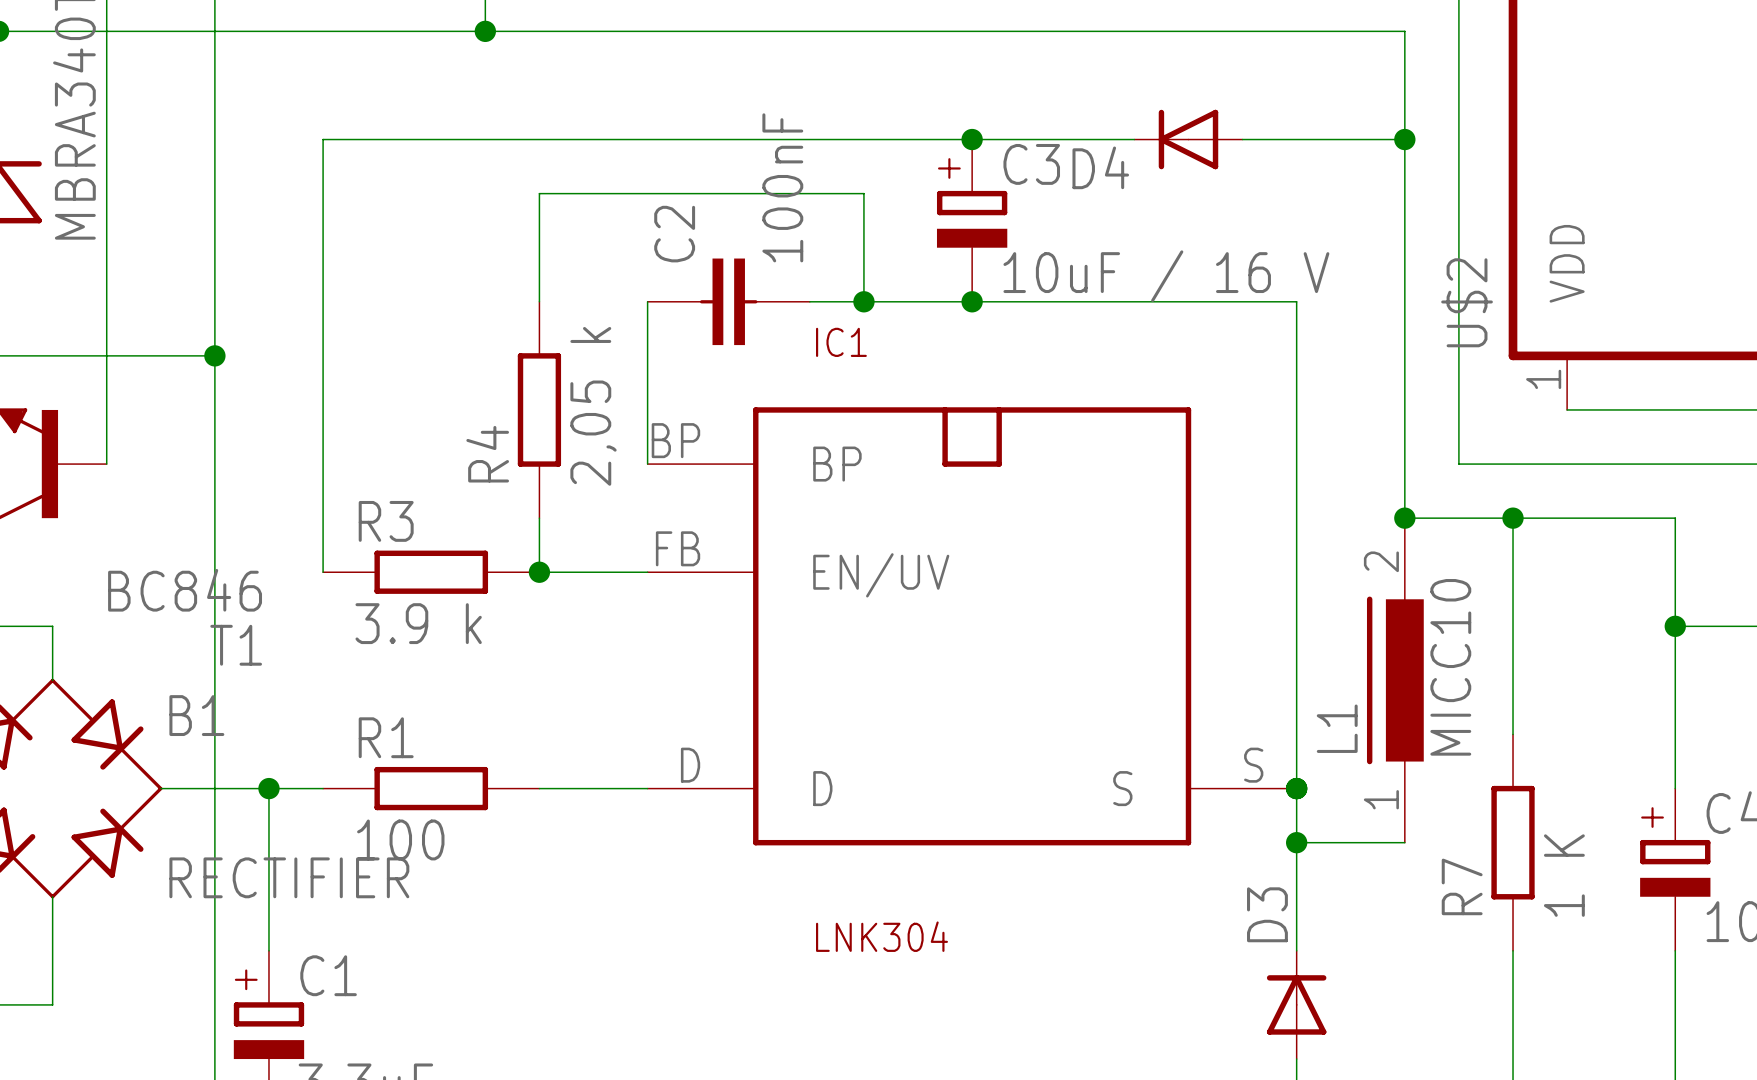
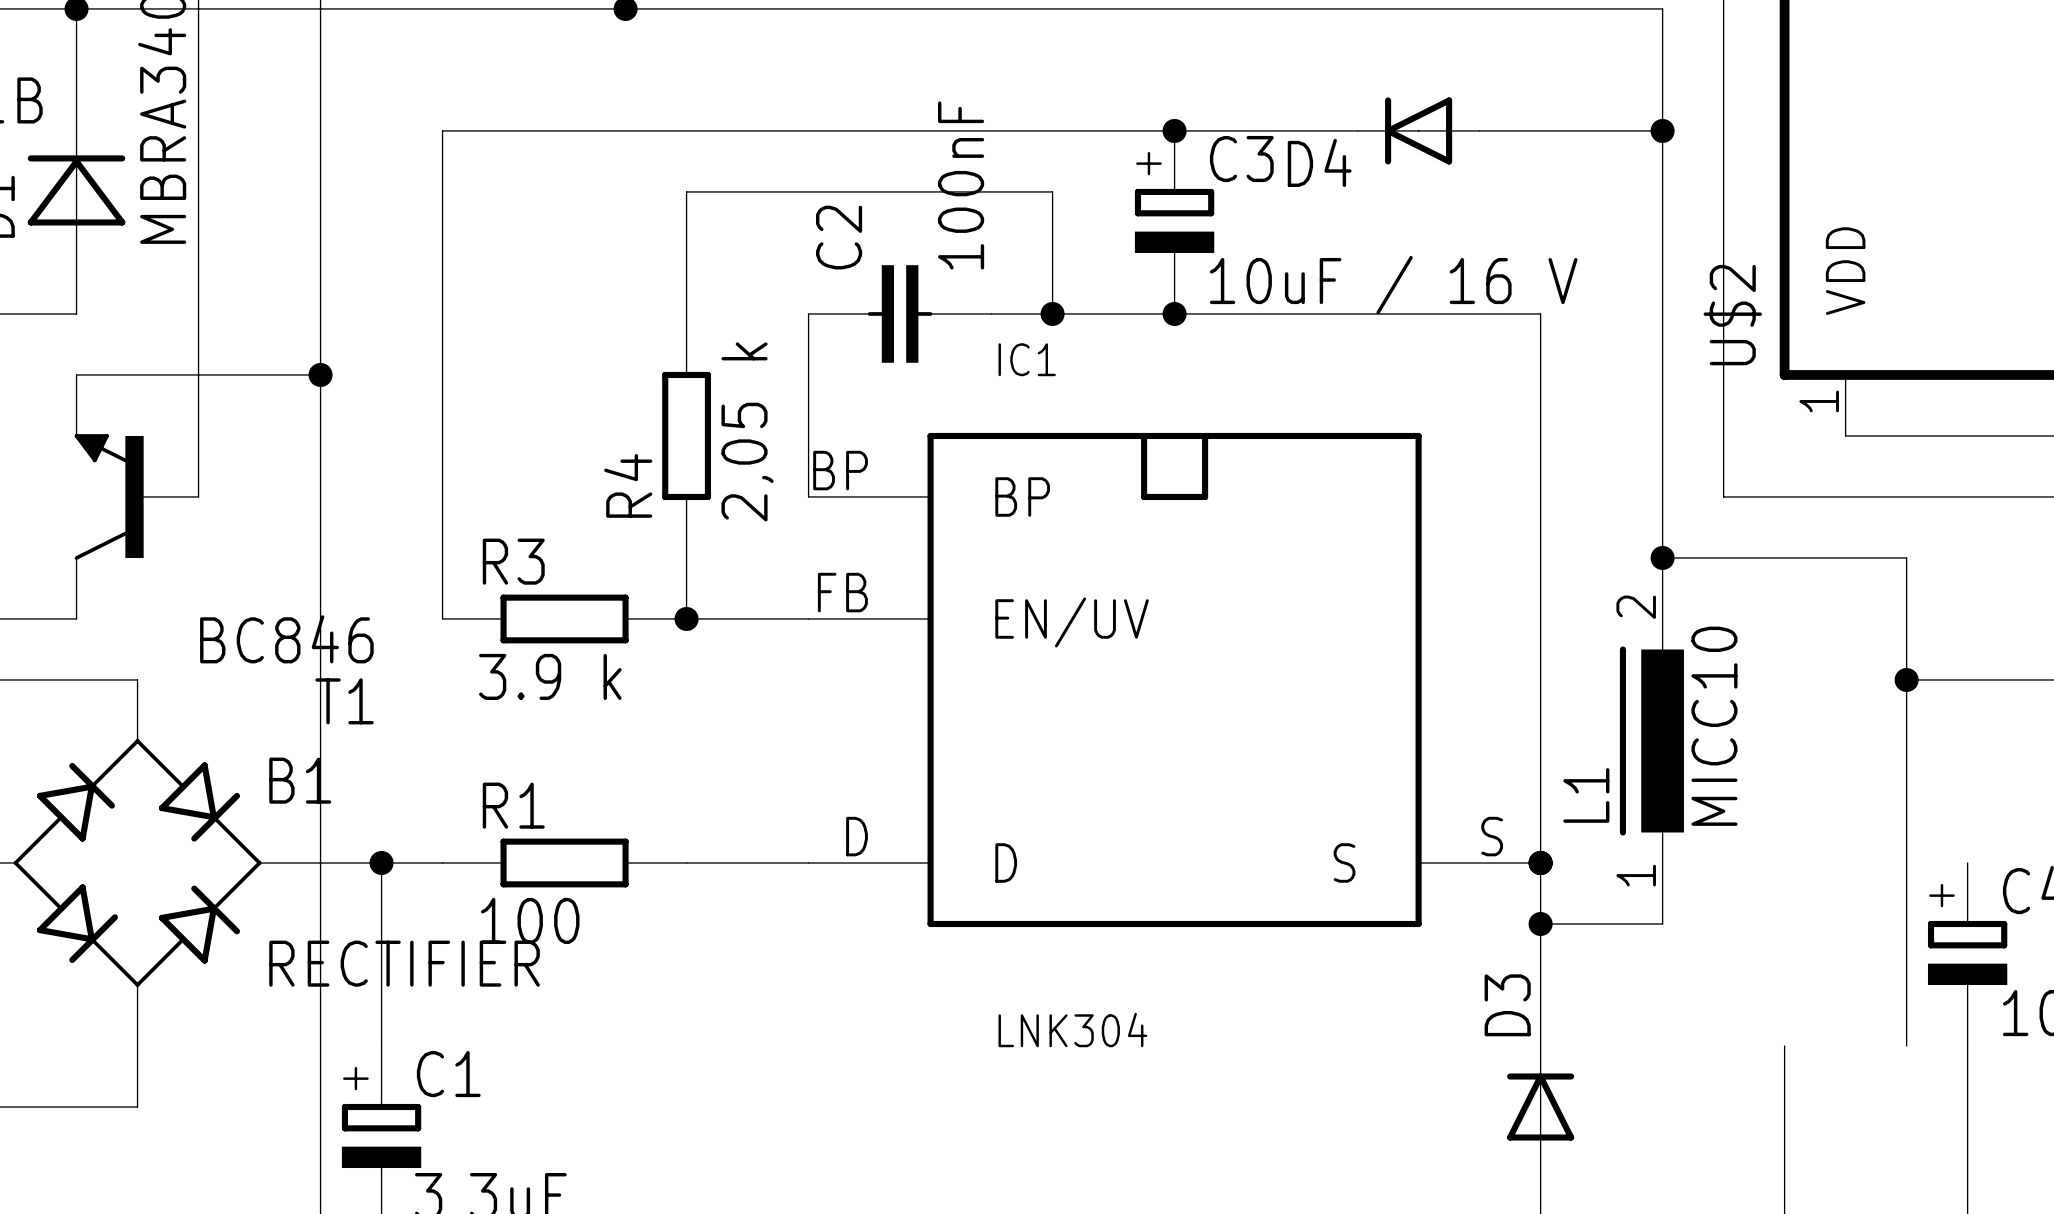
wire: (1513, 518) (1513, 734) -> none
junction: (1513, 518) -> none
wire: (1621, 518) (1675, 518) (1675, 788) -> (1906, 557) (1906, 1046)
wire: none -> (1906, 679) (1967, 679)
junction position: (1675, 626) -> (1906, 679)
R7: 1 K (1513, 842) -> none

